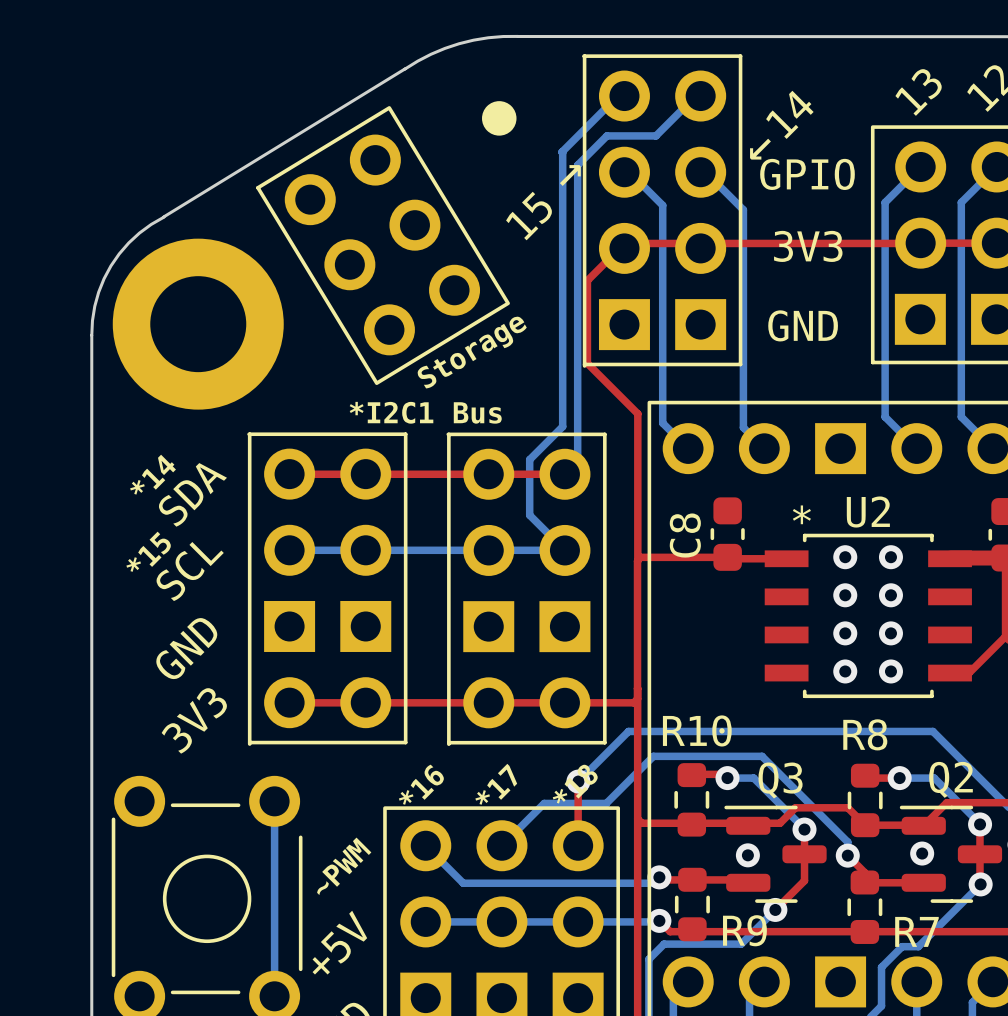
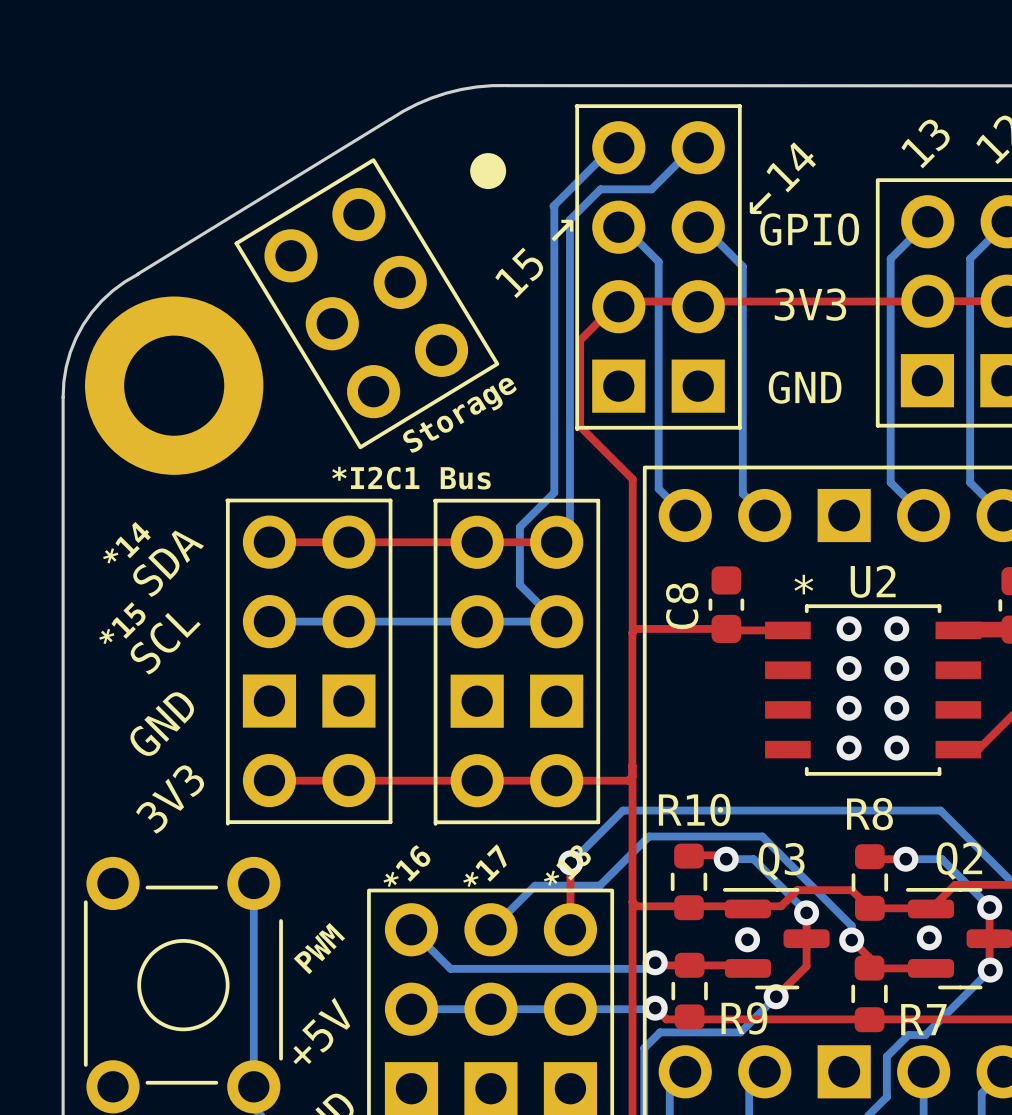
text: ~PWM (344, 866) -> PWM (319, 948)

